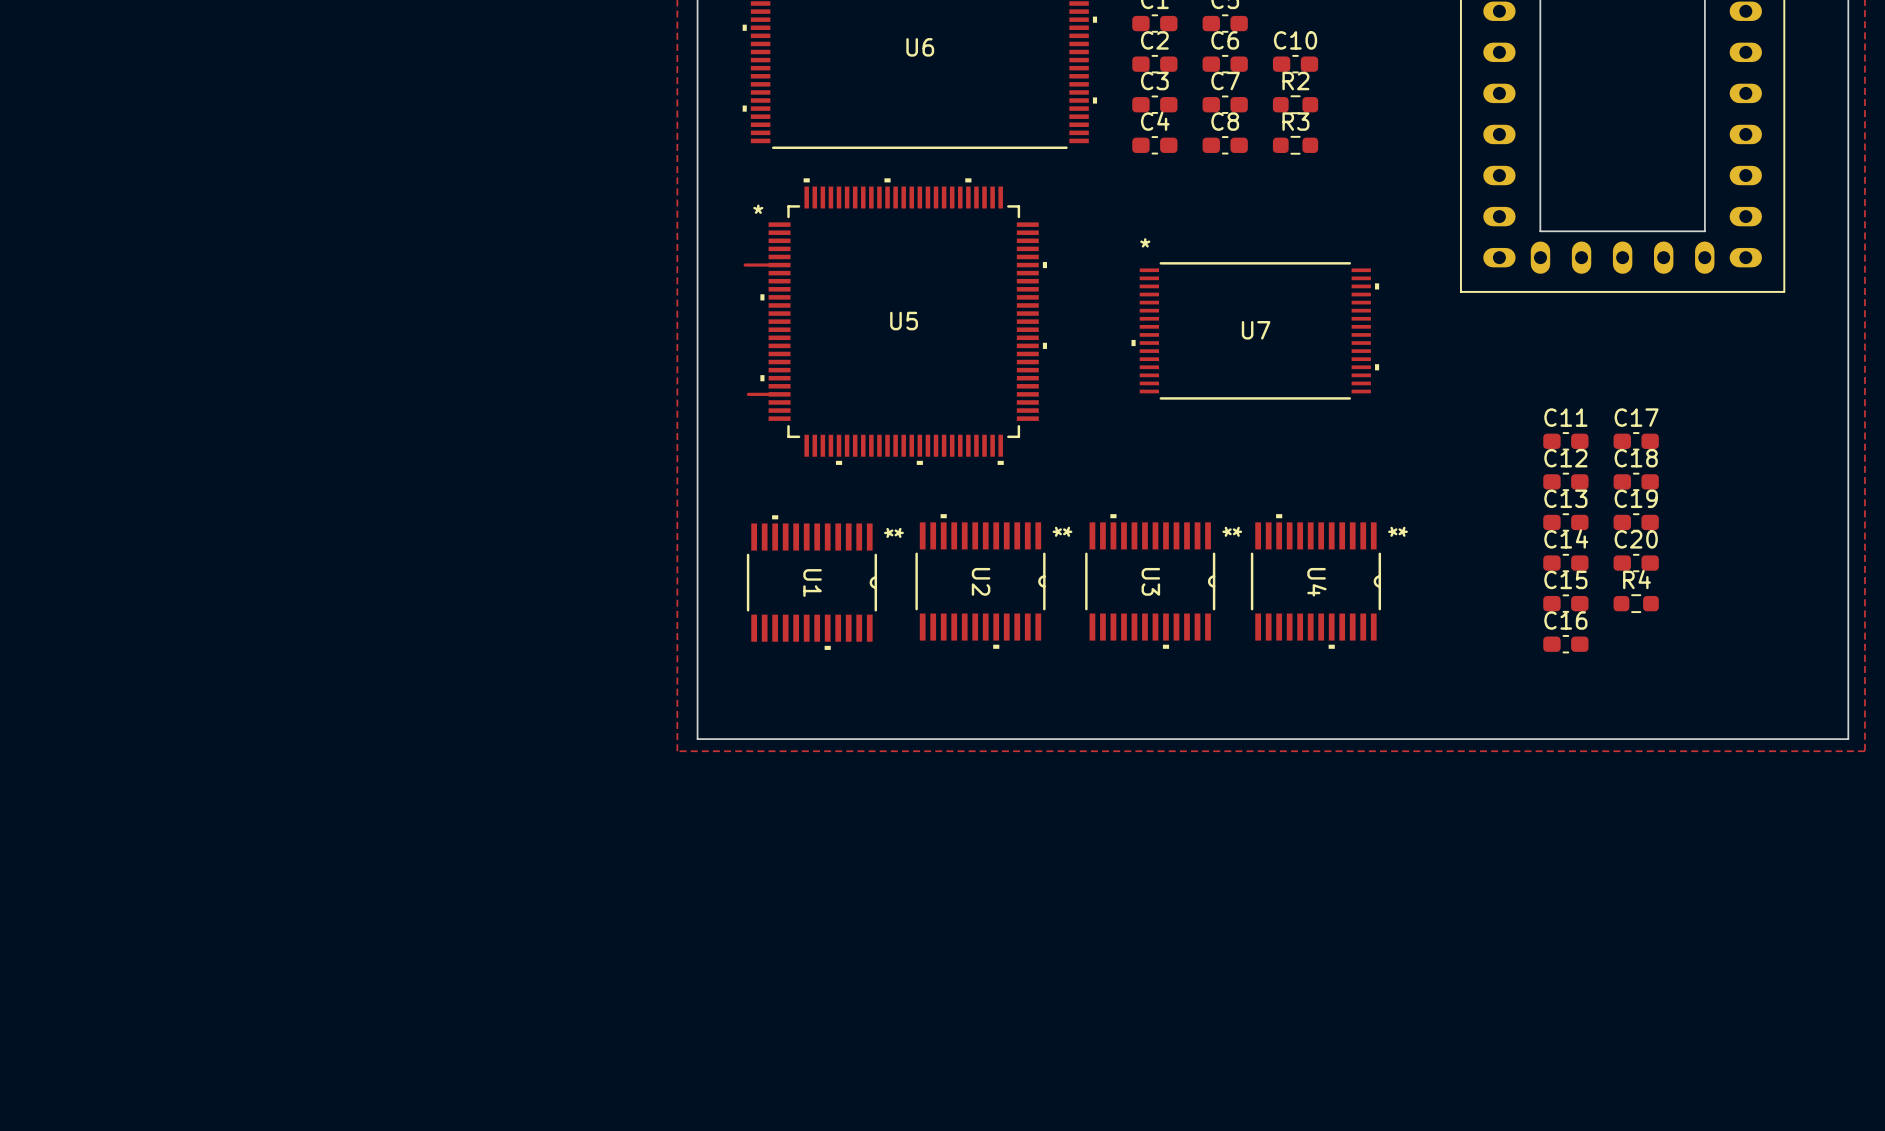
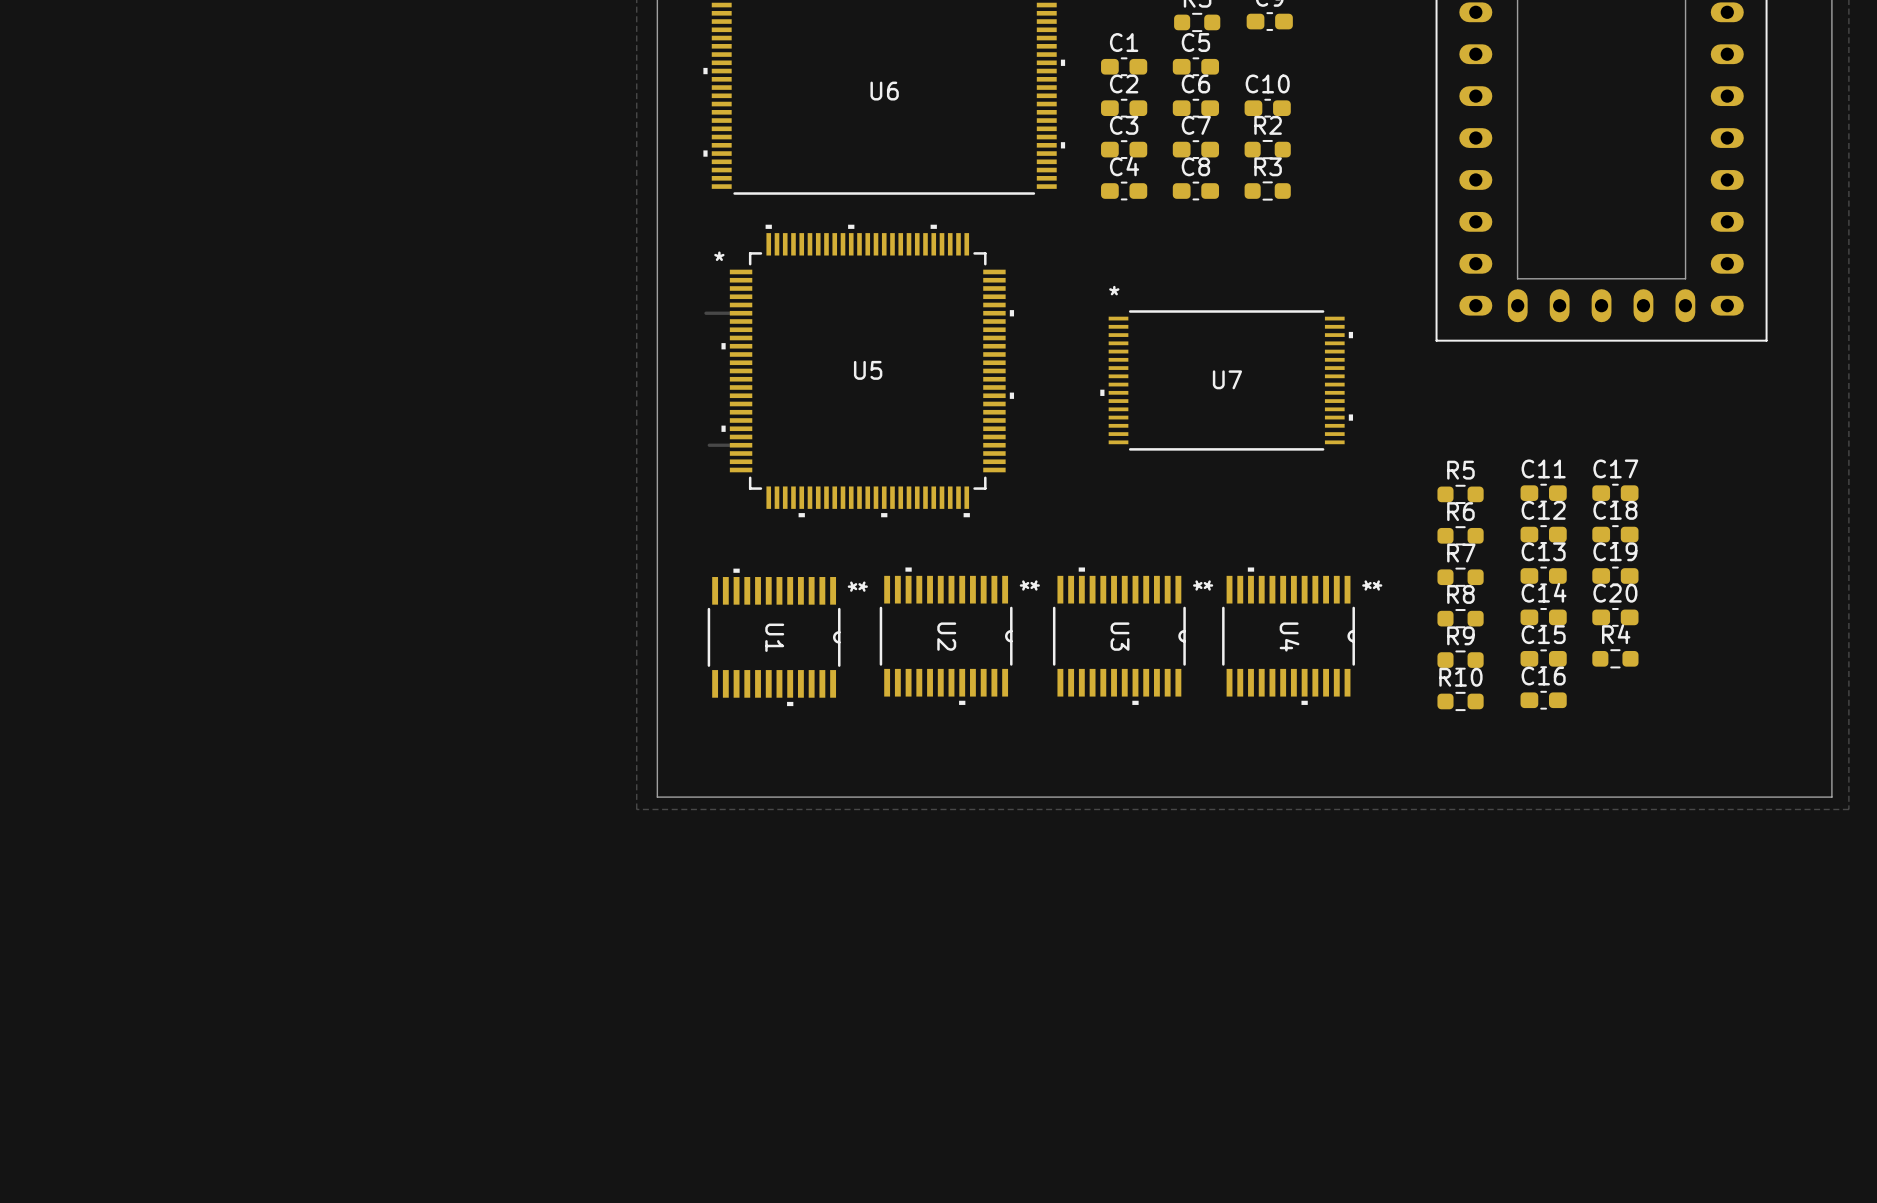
R5: none -> (1460, 494)
R6: none -> (1460, 535)
R7: none -> (1460, 577)
R8: none -> (1460, 618)
R9: none -> (1460, 660)
R10: none -> (1460, 701)

